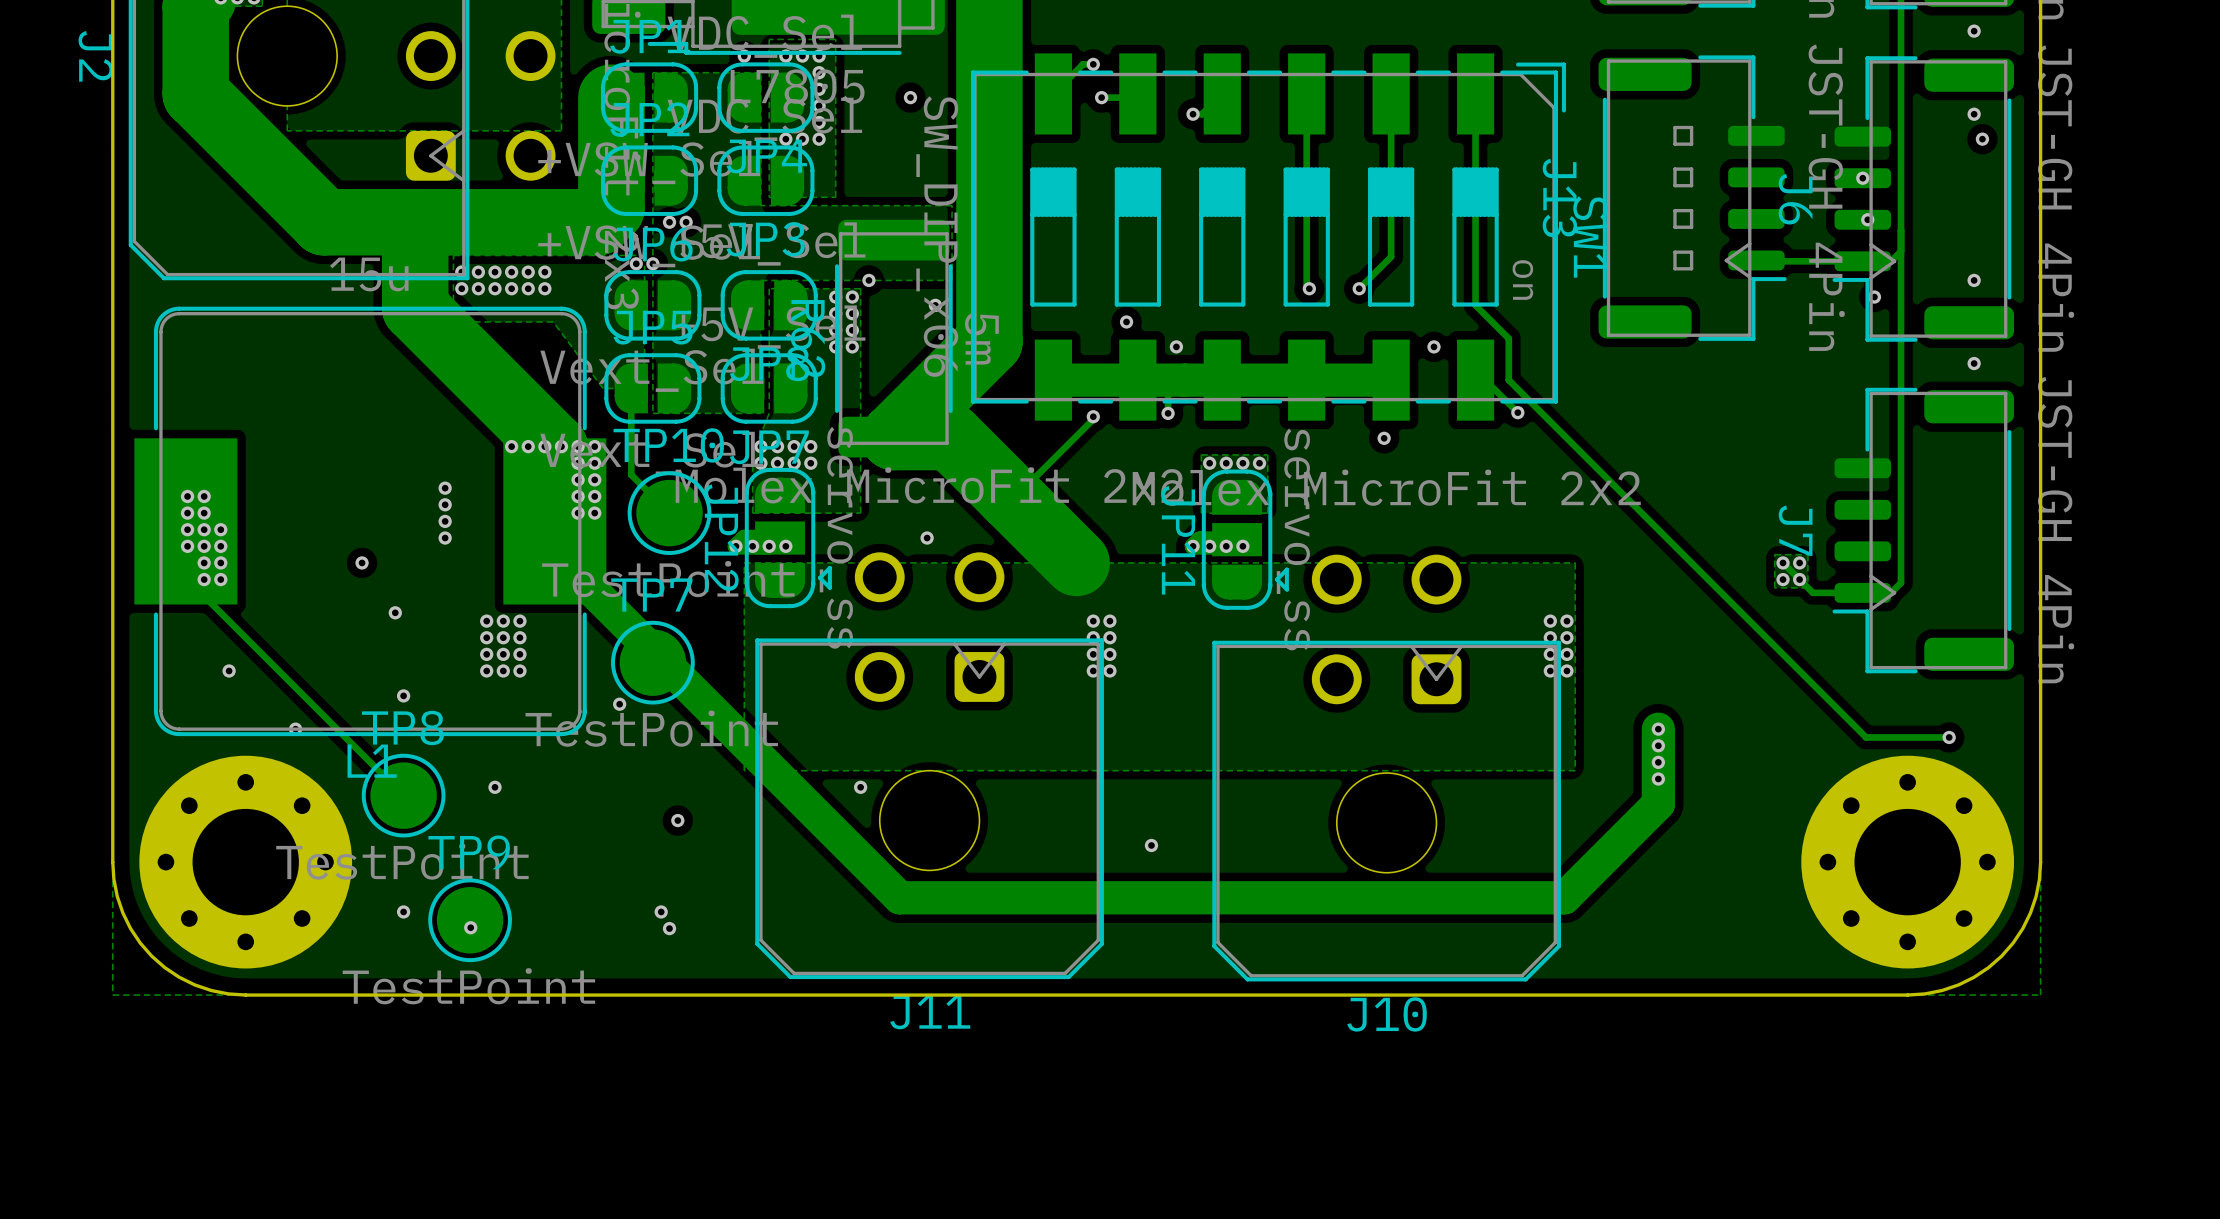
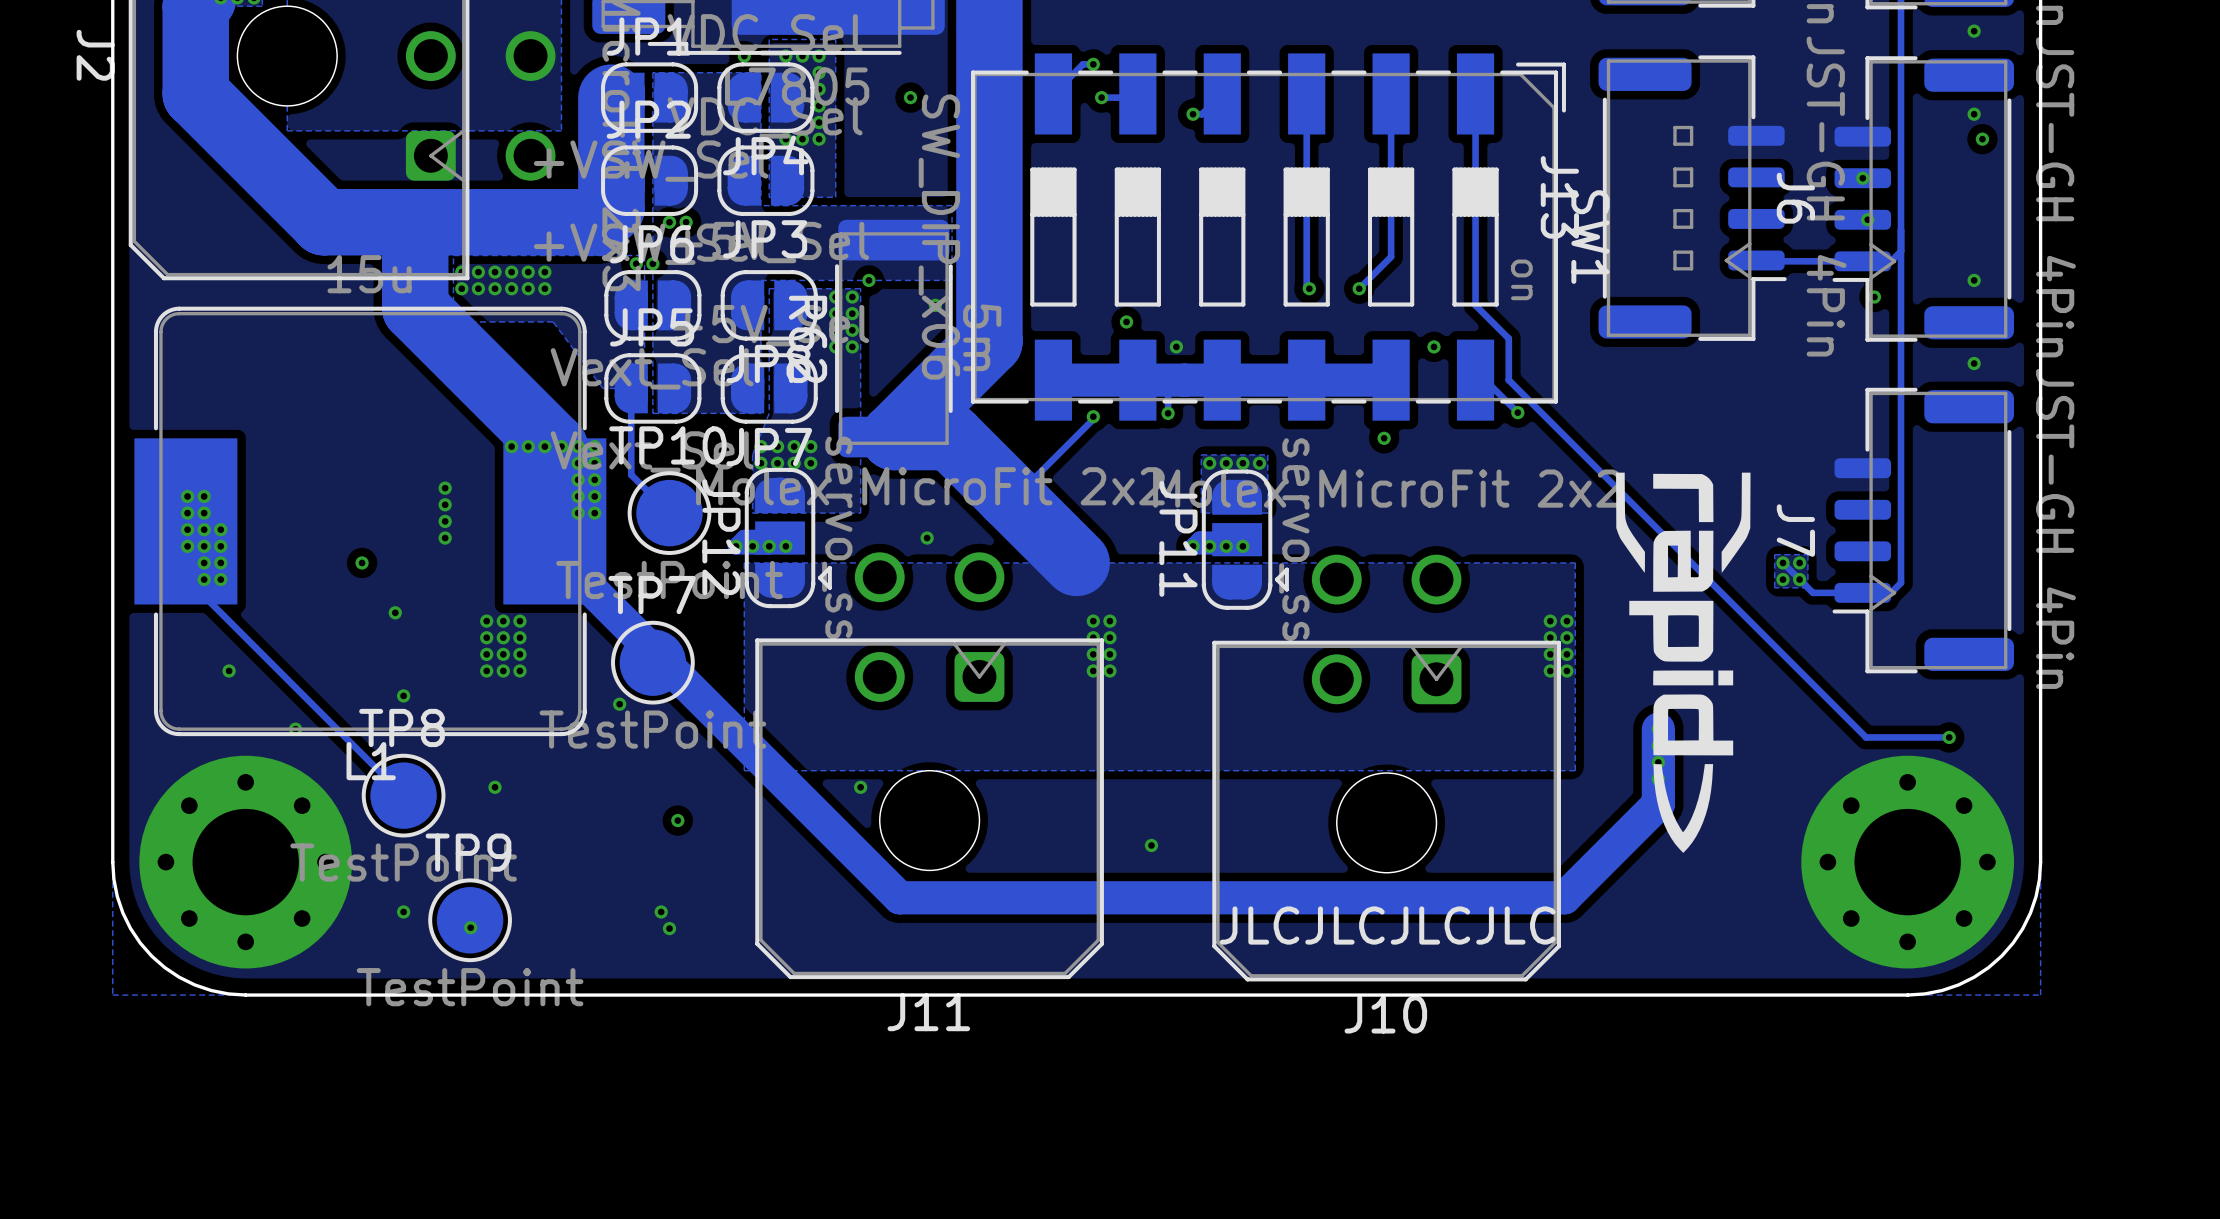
drawing: none -> [1616, 472, 1751, 853]
text: none -> JLCJLCJLCJLC (1387, 925)

